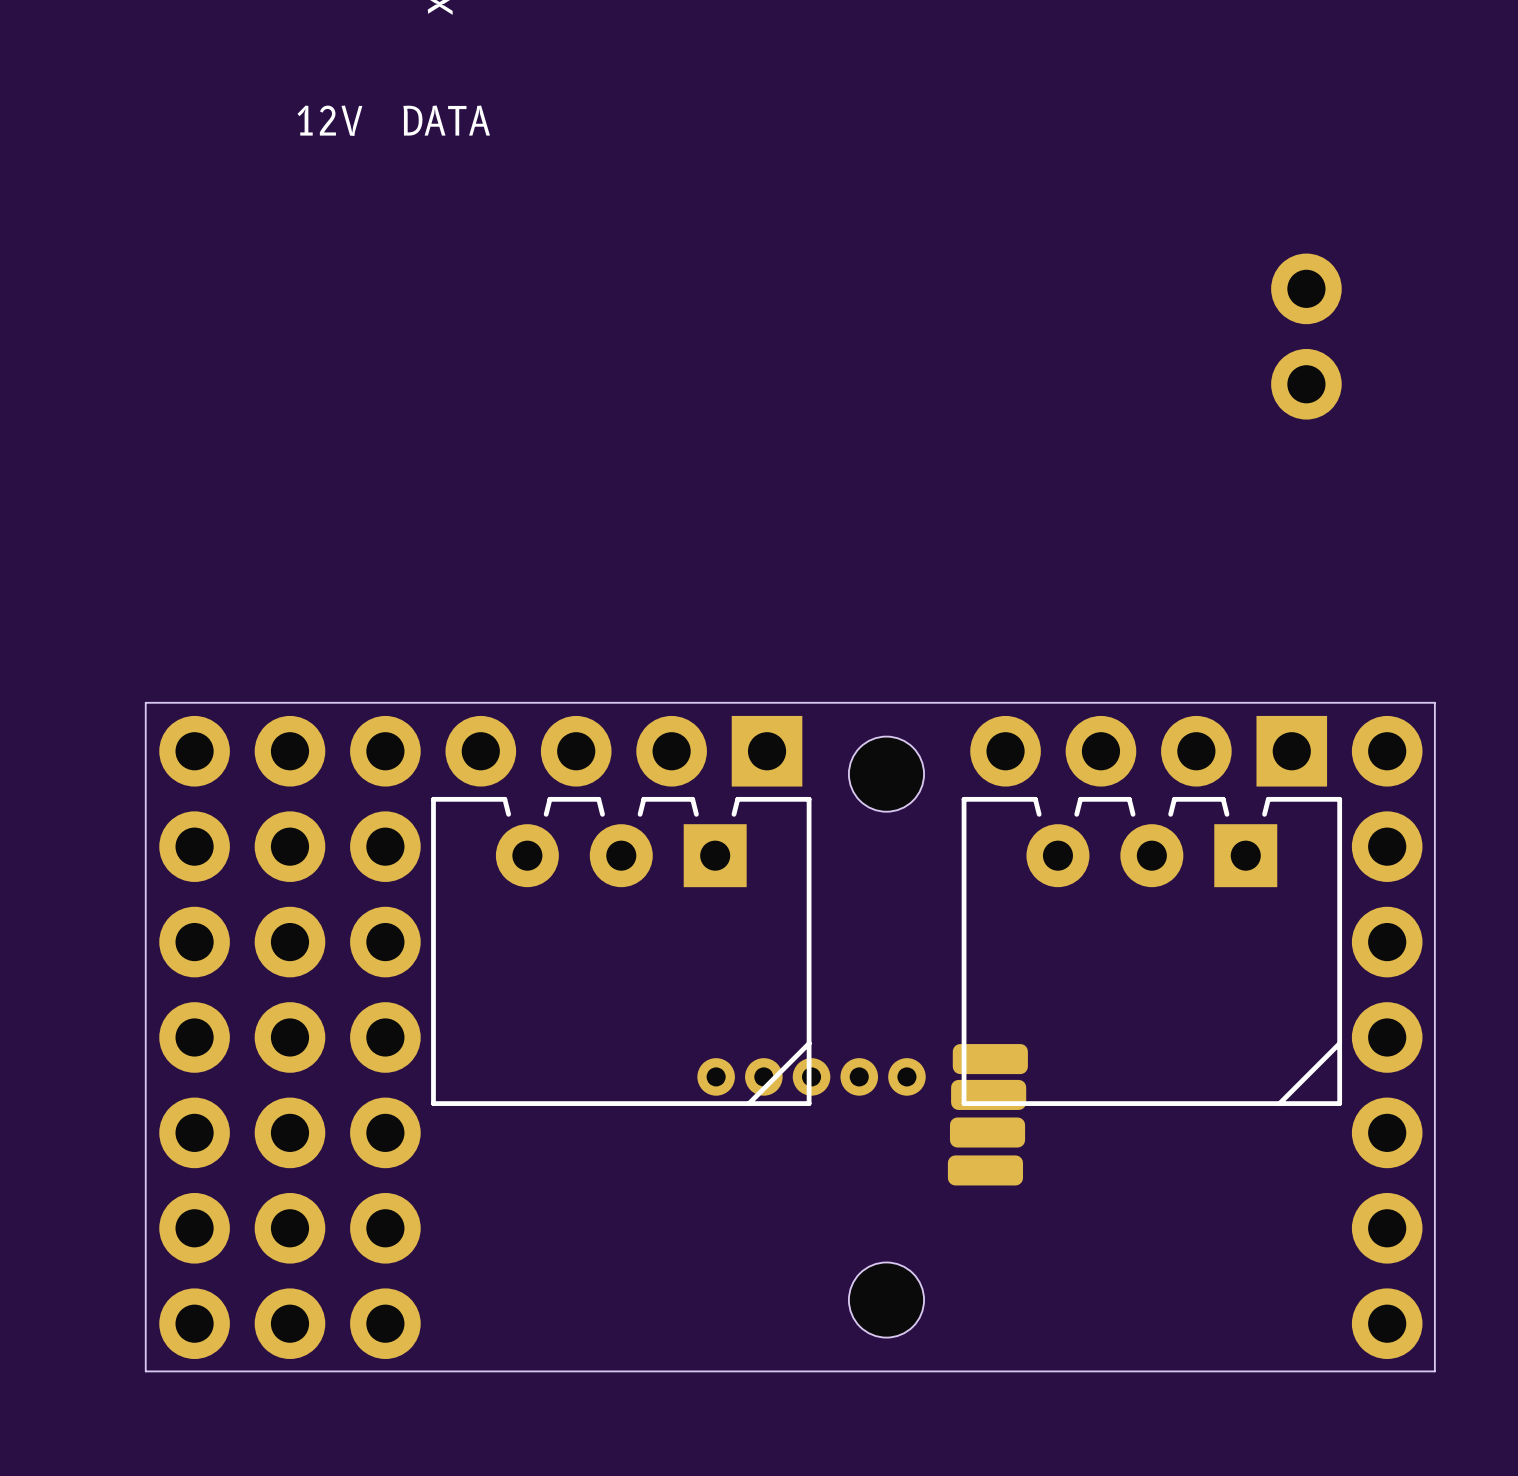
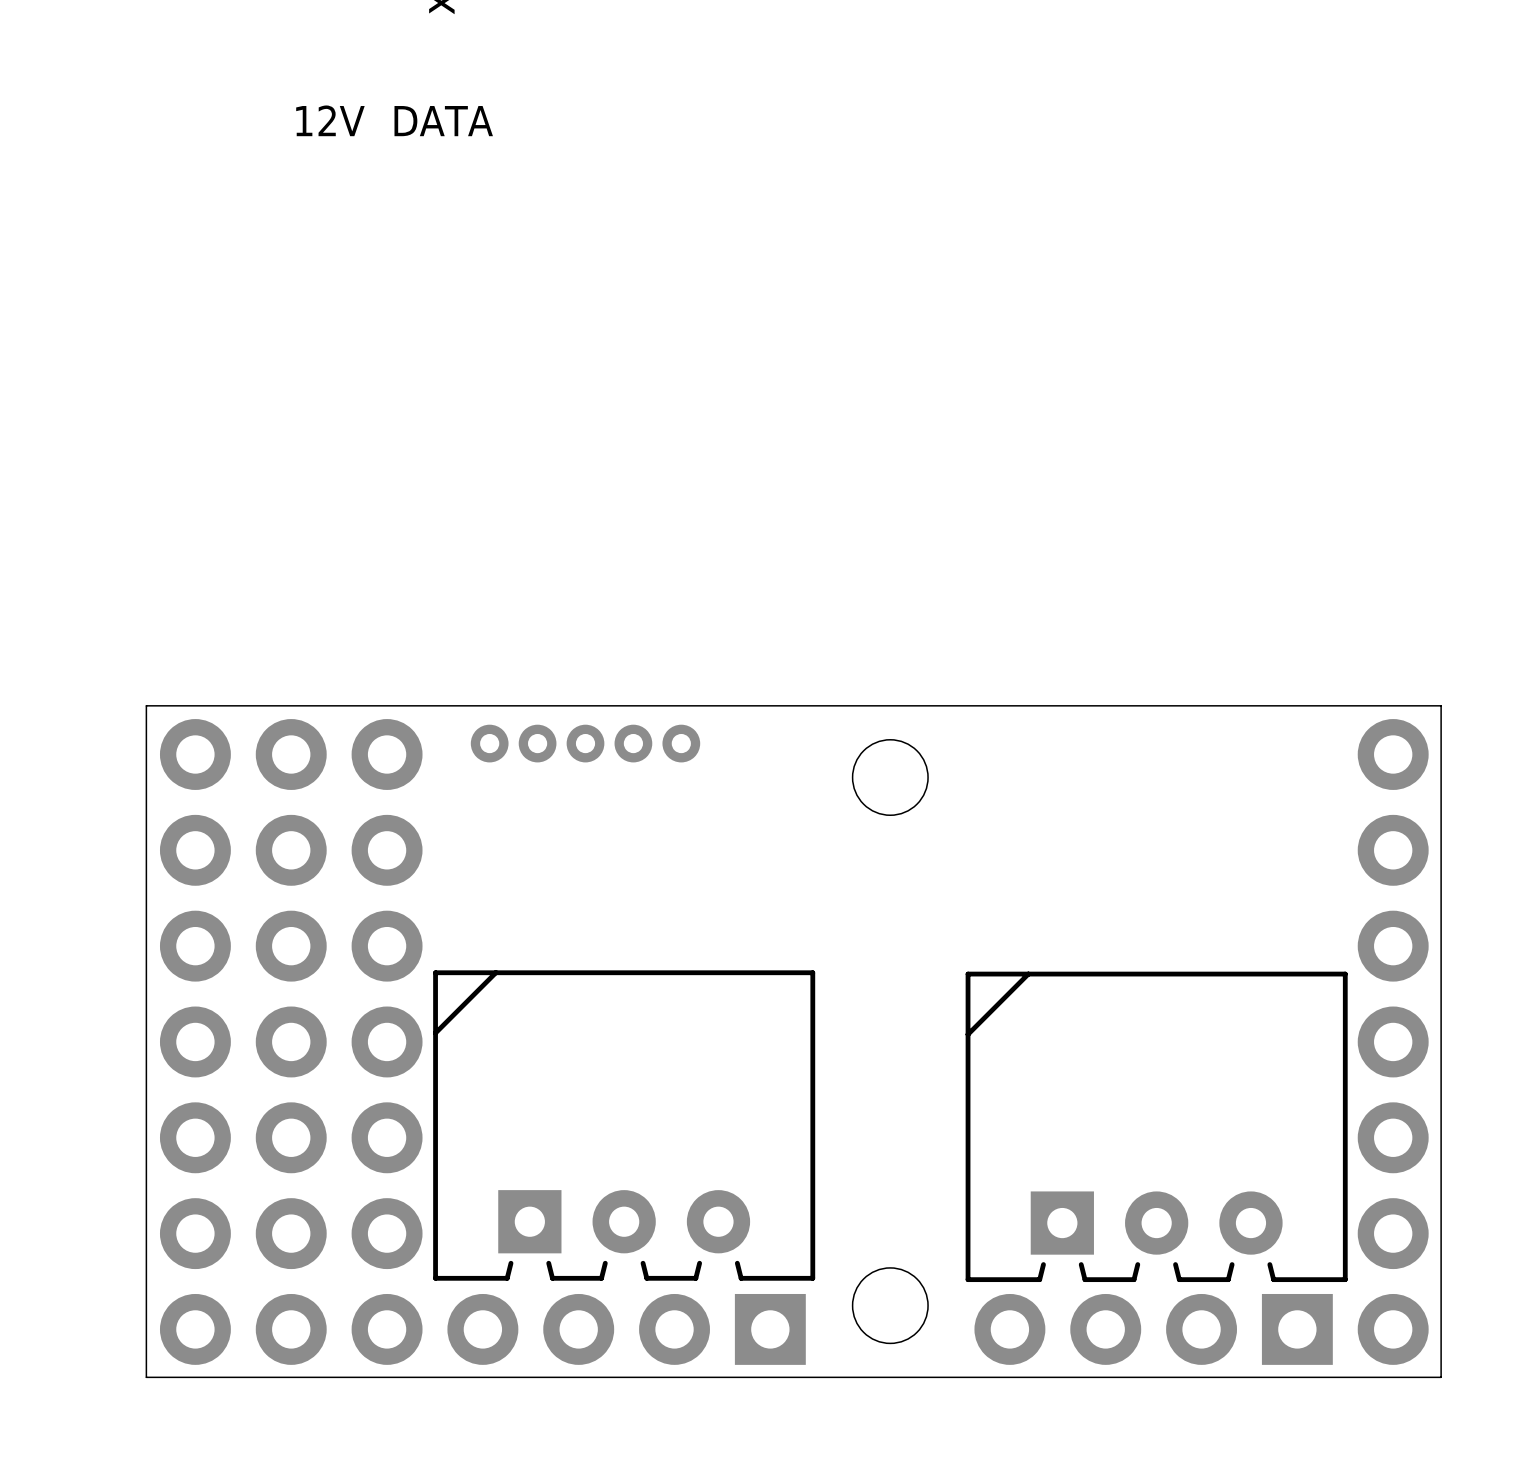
part: (1306, 336) -> none
part: (623, 751) -> none
part: (1148, 751) -> none
part rotation: 0° (621, 951) -> 180° (624, 1125)
part rotation: 0° (1151, 951) -> 180° (1156, 1126)
part: (990, 1059) -> none
part position: (811, 1076) -> (585, 743)
part: (988, 1094) -> none
part: (987, 1132) -> none
part: (985, 1170) -> none
part: none -> (626, 1329)
part: none -> (1153, 1329)

